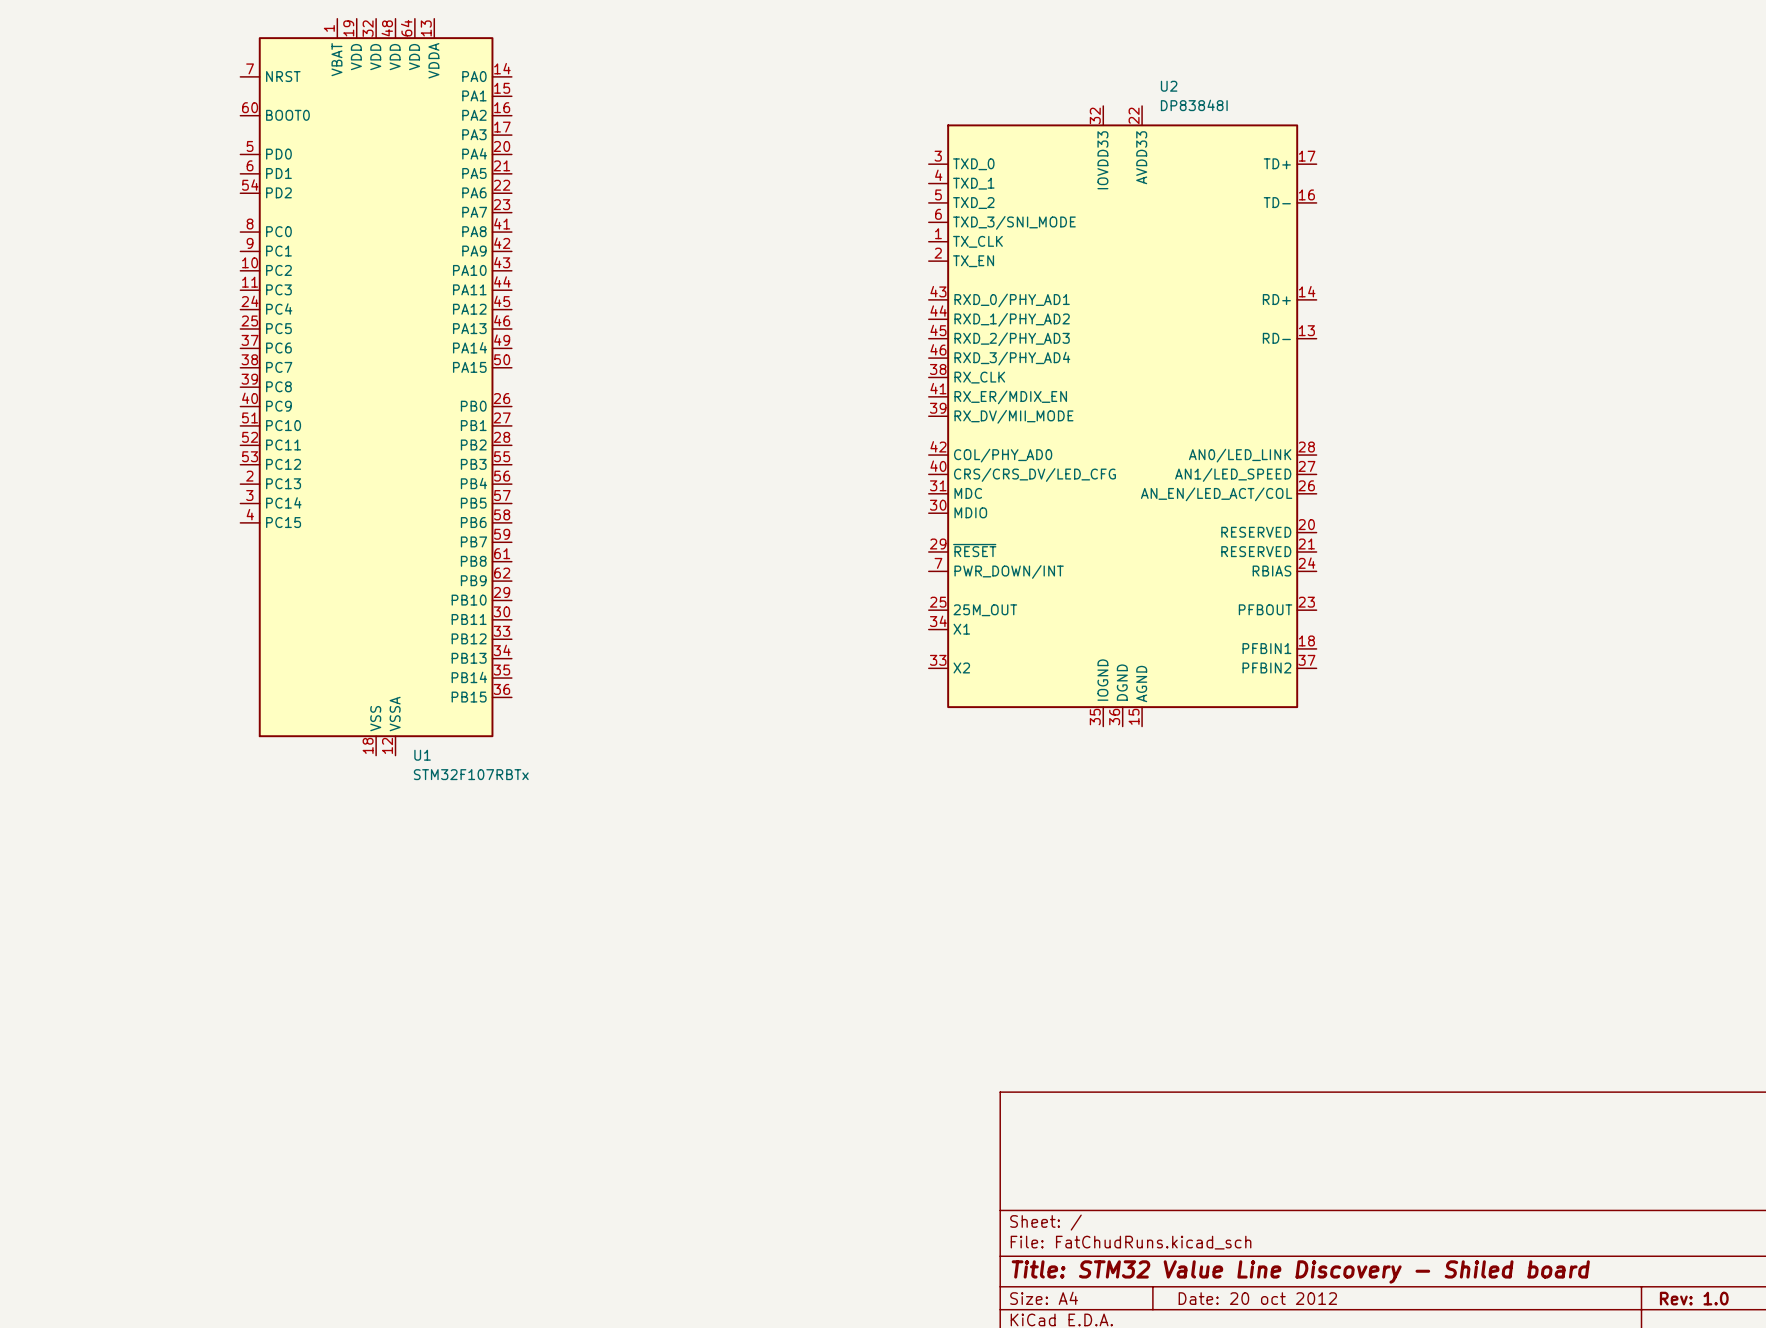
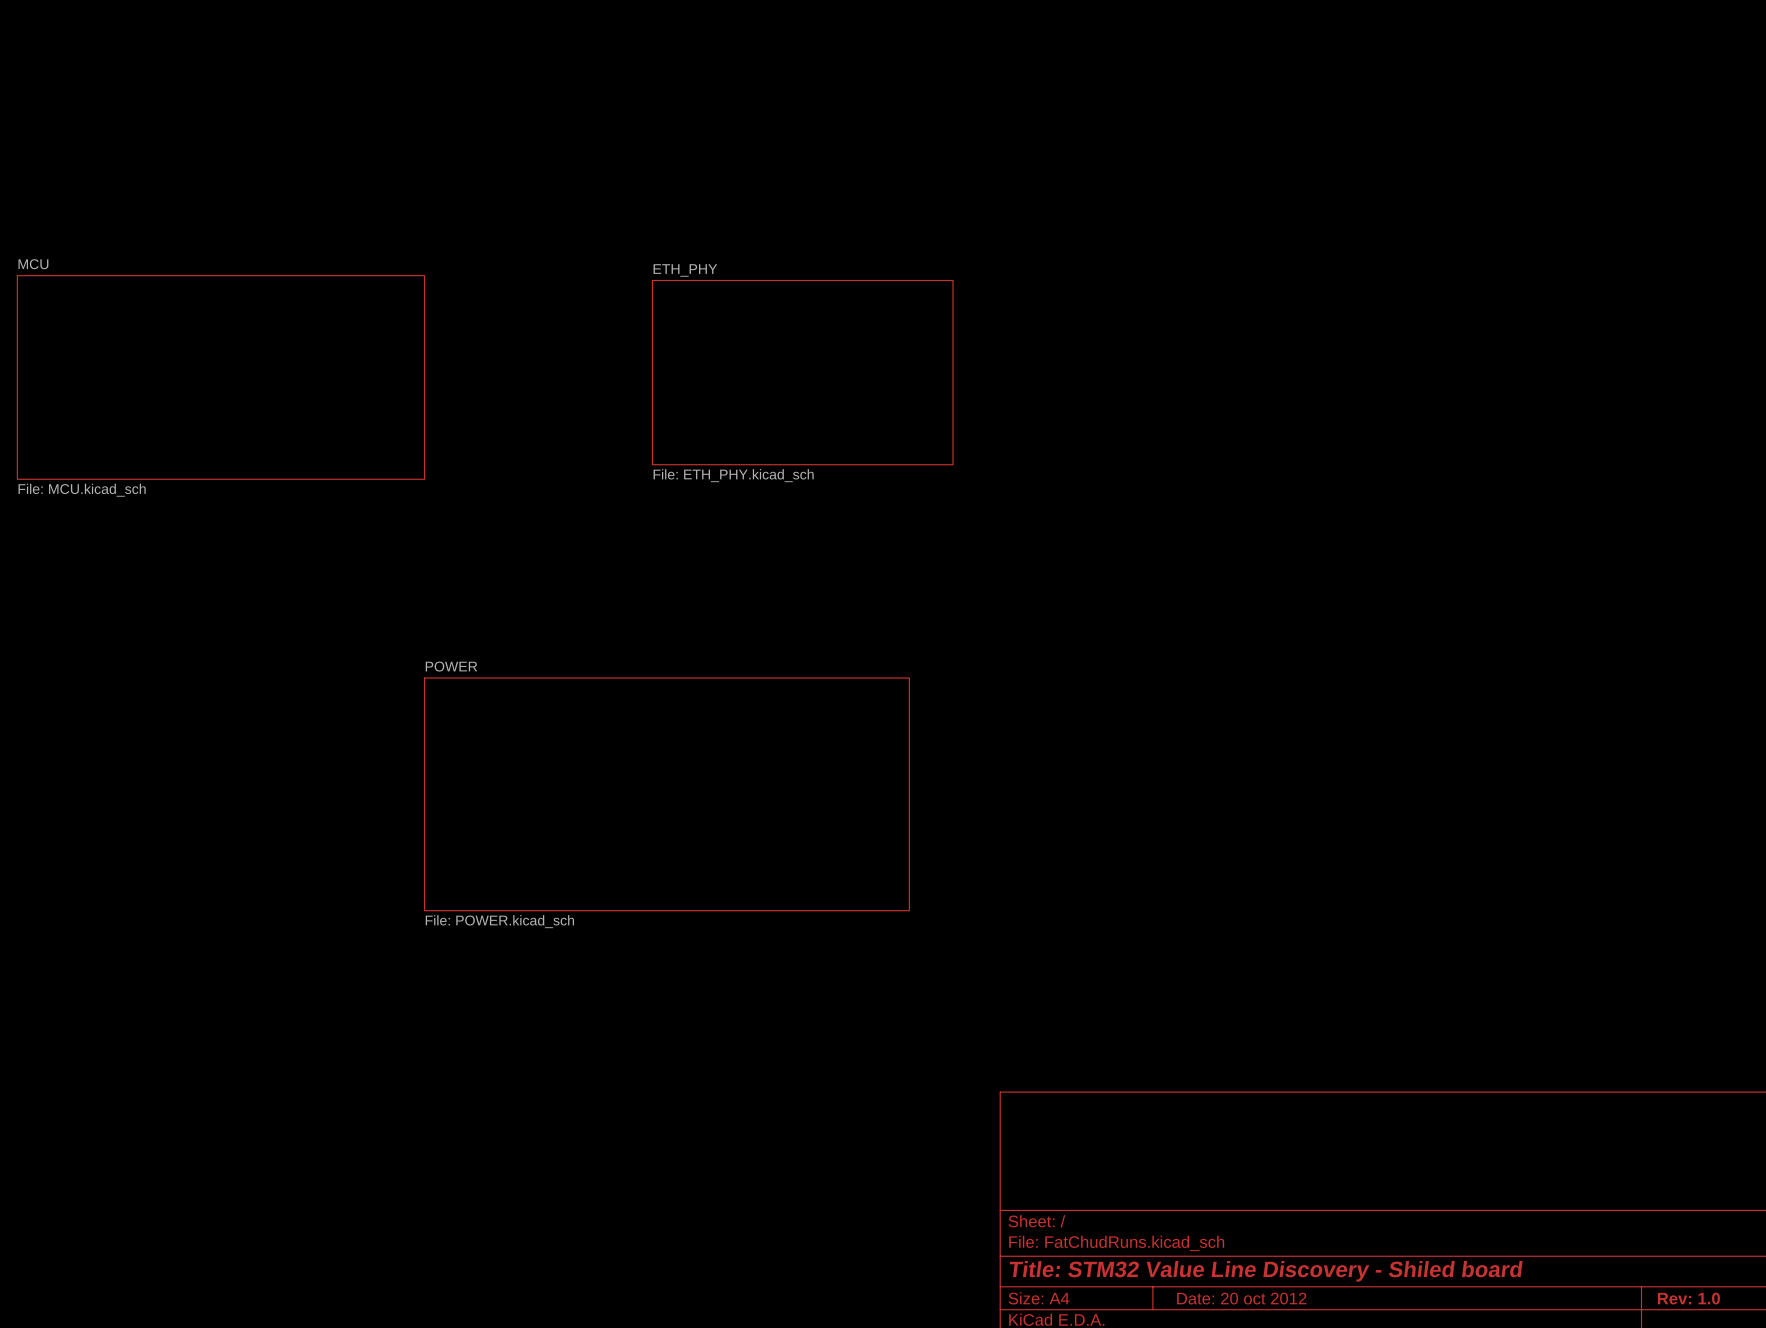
sheet ETH_PHY: none -> File: ETH_PHY.kicad_sch (802, 372)
sheet MCU: none -> File: MCU.kicad_sch (220, 377)
U1: STM32F107RBTx (376, 387) -> none
U2: DP83848I (1122, 416) -> none
sheet POWER: none -> File: POWER.kicad_sch (666, 794)

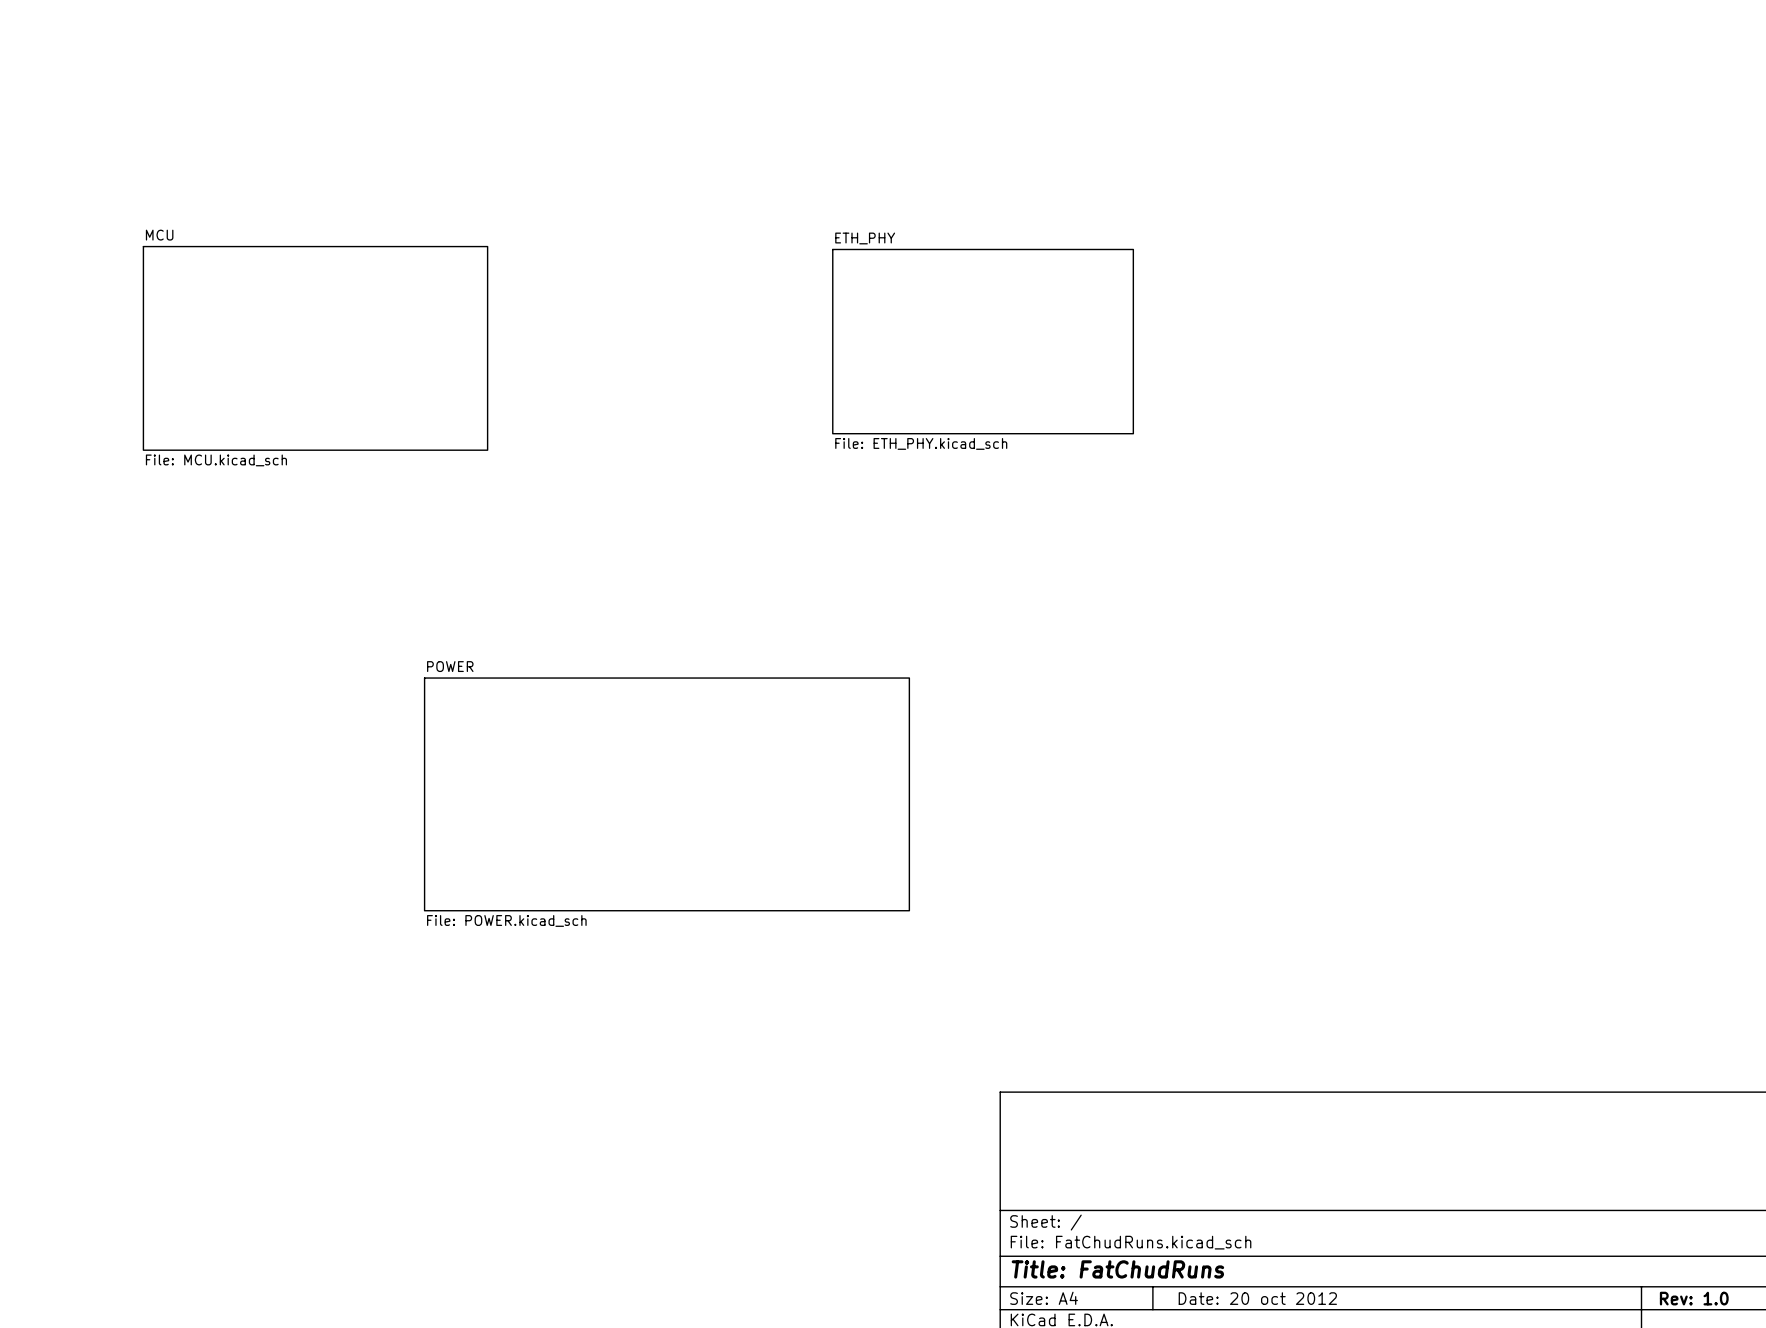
sheet MCU: none -> File: MCU.kicad_sch (315, 348)
sheet ETH_PHY position: (802, 372) -> (983, 341)
sheet MCU: File: MCU.kicad_sch (220, 377) -> none
title block: Title: STM32 Value Line Discovery - Shiled board (1266, 1271) -> Title: FatChudRuns (1117, 1269)

